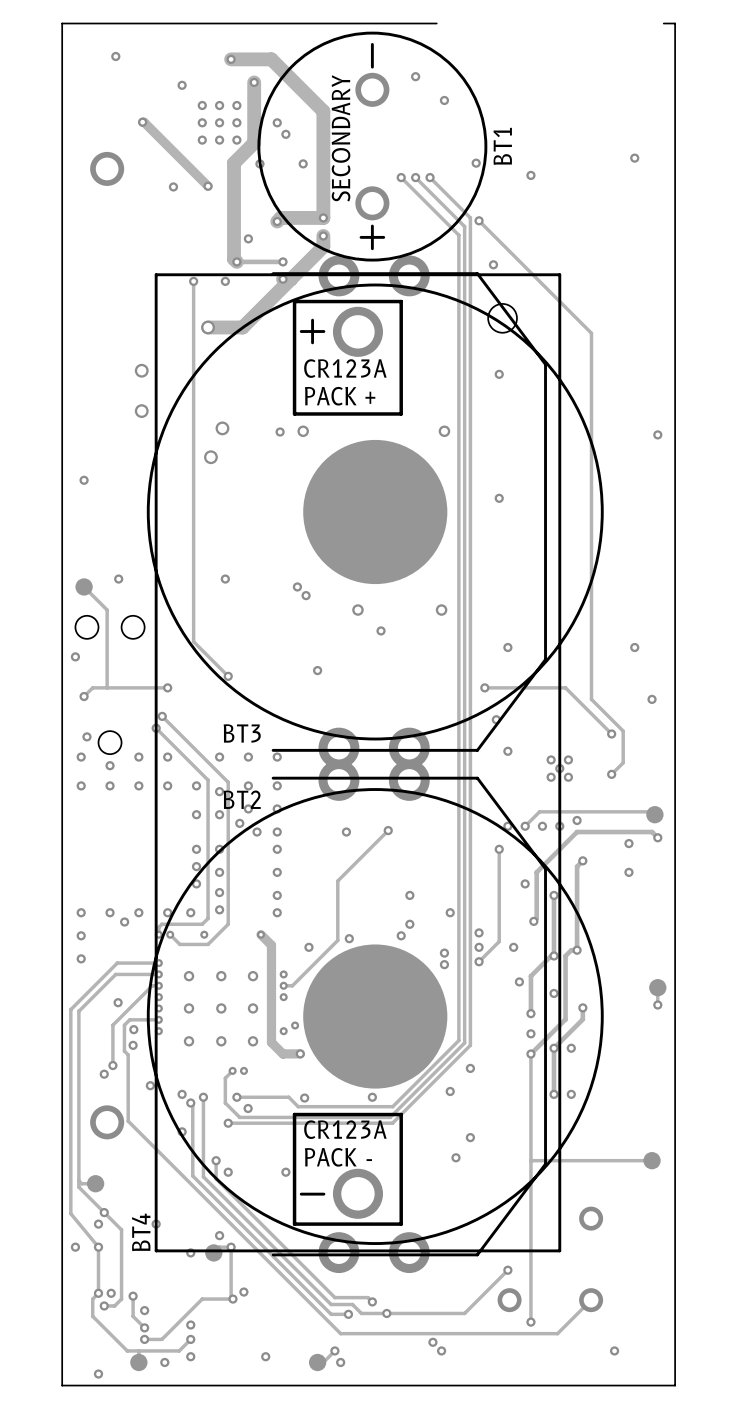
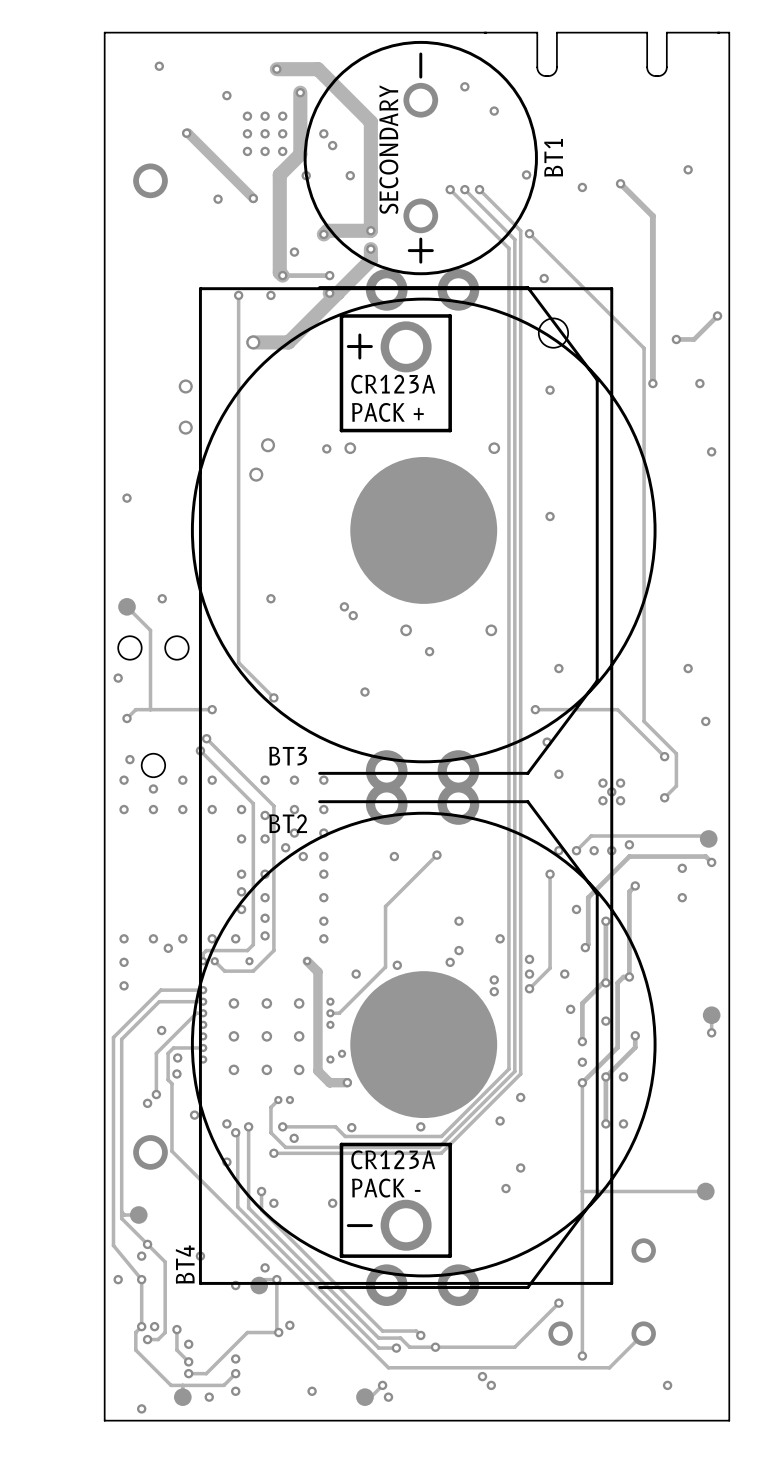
part: none -> (602, 54)
track: none -> (620, 183) (652, 216) (652, 383)
via: none -> (620, 183)
track: none -> (717, 315) (694, 339) (676, 339)
via: none -> (717, 315)
via: none -> (676, 339)
via: none -> (652, 383)
via: none -> (699, 383)

